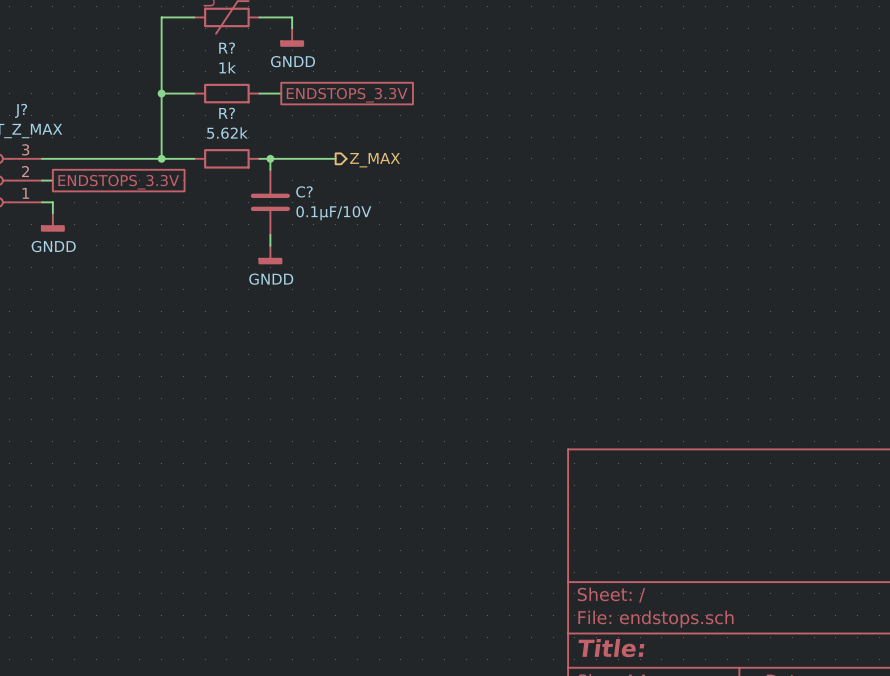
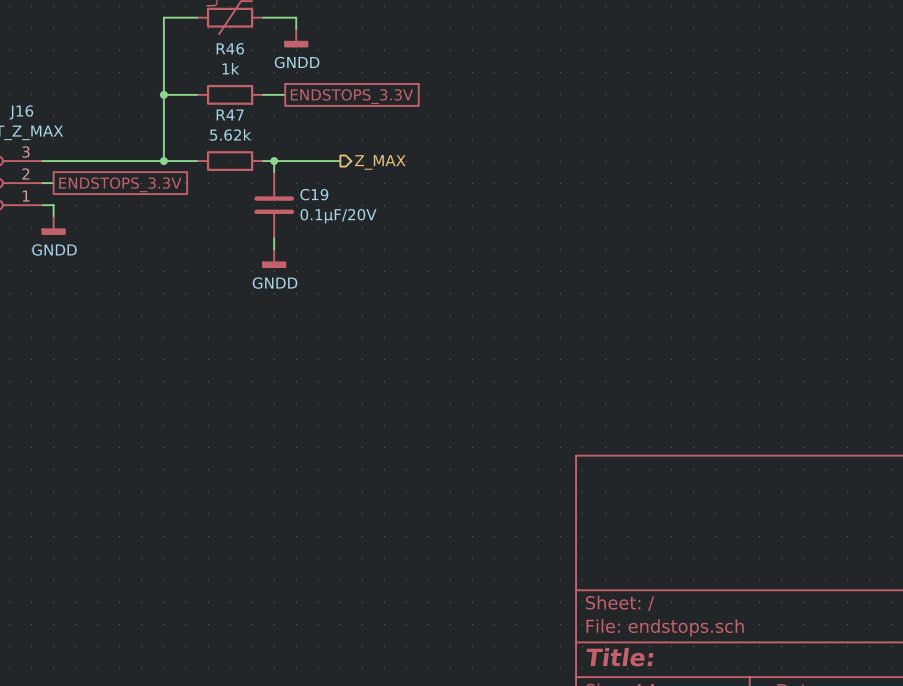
R? name: R? (227, 48) -> R46 (230, 48)
J? name: J? (21, 110) -> J16 (21, 112)
R? name: R? (227, 113) -> R47 (230, 114)
C? name: C? (304, 191) -> C19 (314, 194)
C? value: 0.1µF/10V (333, 213) -> 0.1µF/20V (338, 216)

